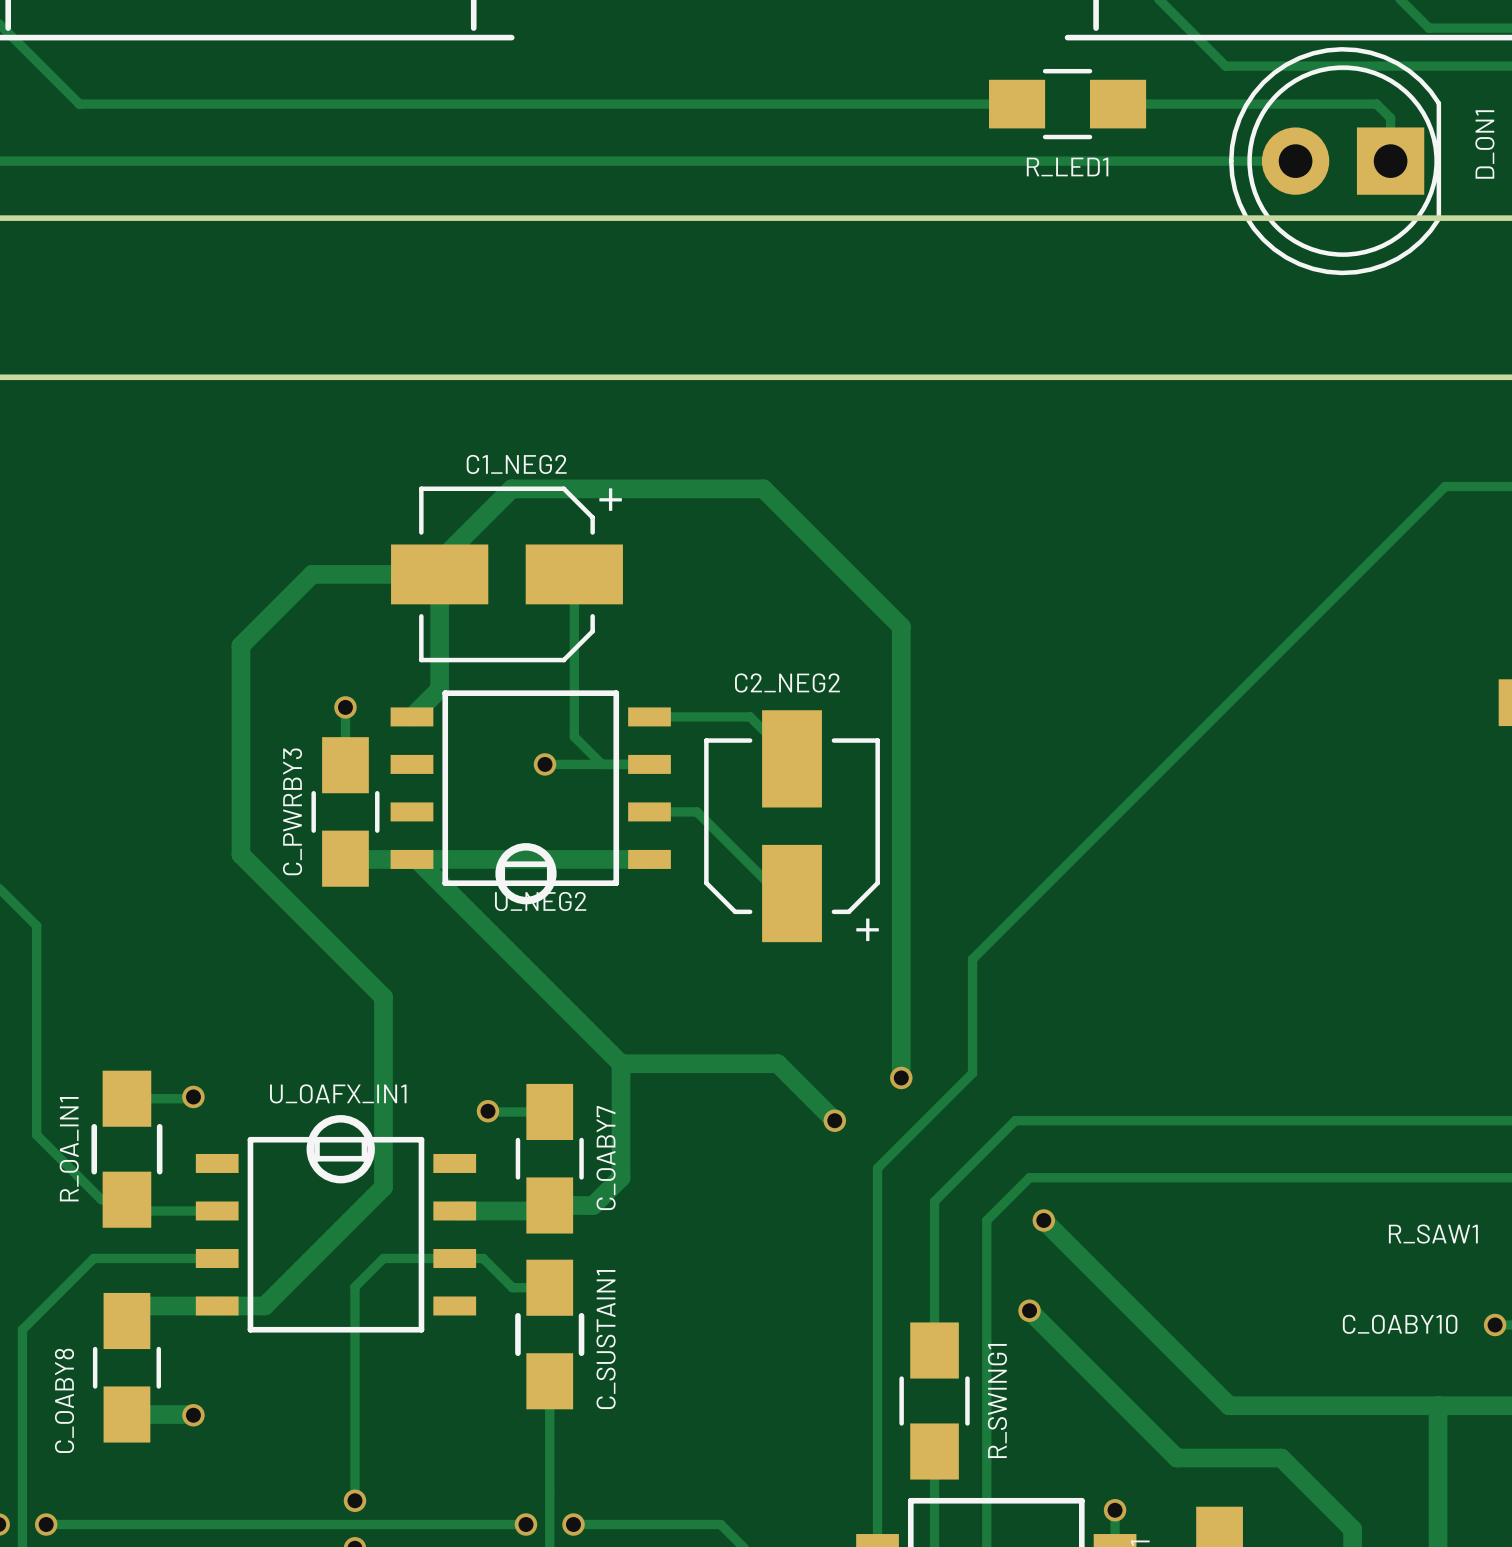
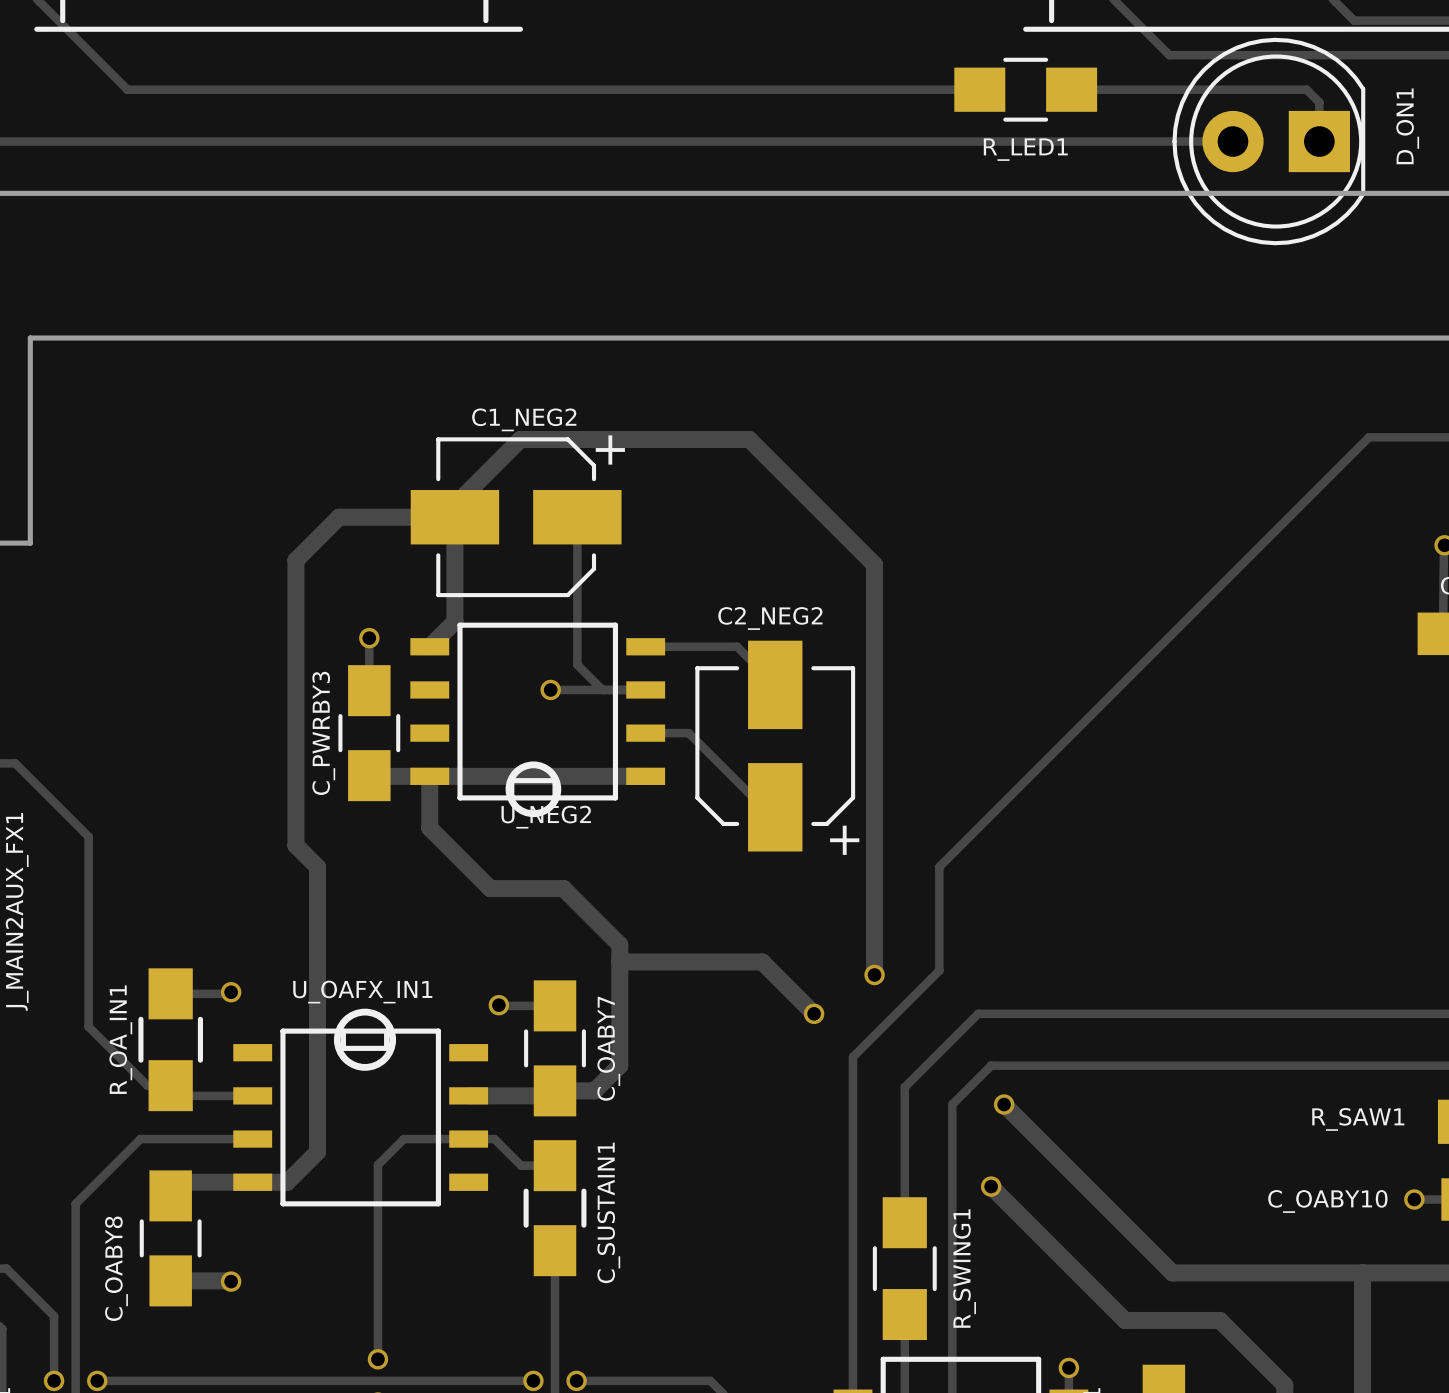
track: (264, 621) (240, 645) (240, 854) (383, 997) (383, 1187) (264, 1305) (255, 1305) -> (295, 560) (295, 845) (317, 867) (317, 1152) (287, 1182)
track: (416, 859) (621, 1063) -> (429, 776) (429, 828) (490, 888) (563, 888) (619, 944) (619, 962)

